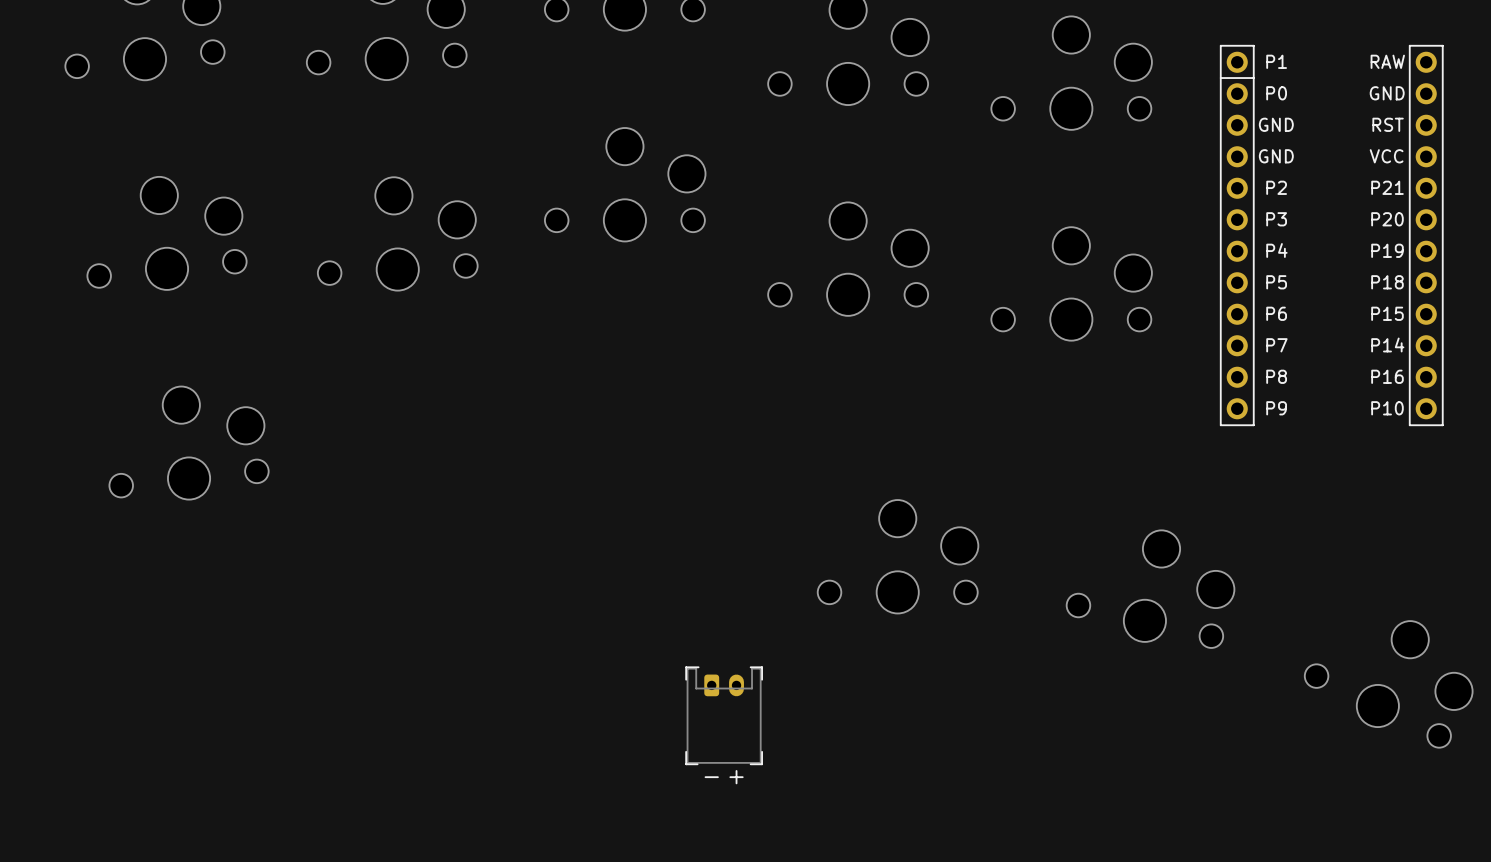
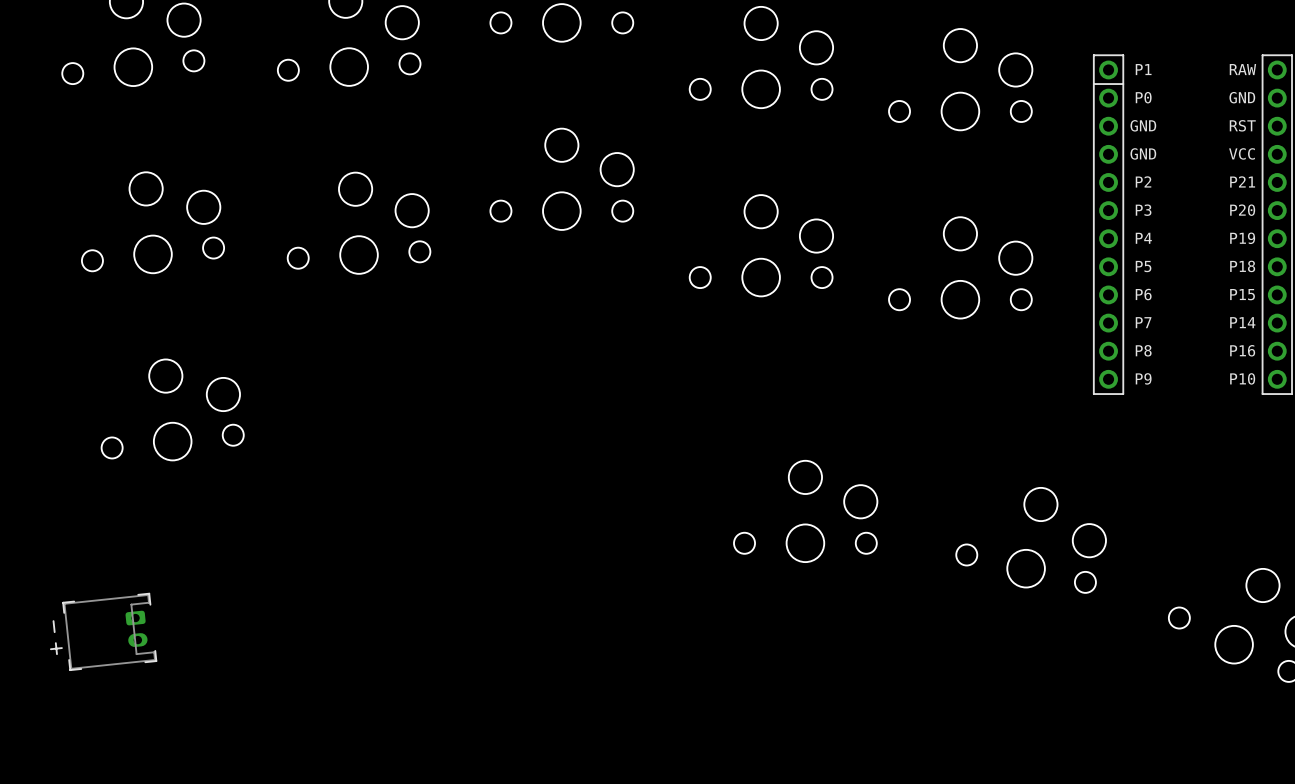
part: none -> (103, 631)
part: (724, 725) -> none

